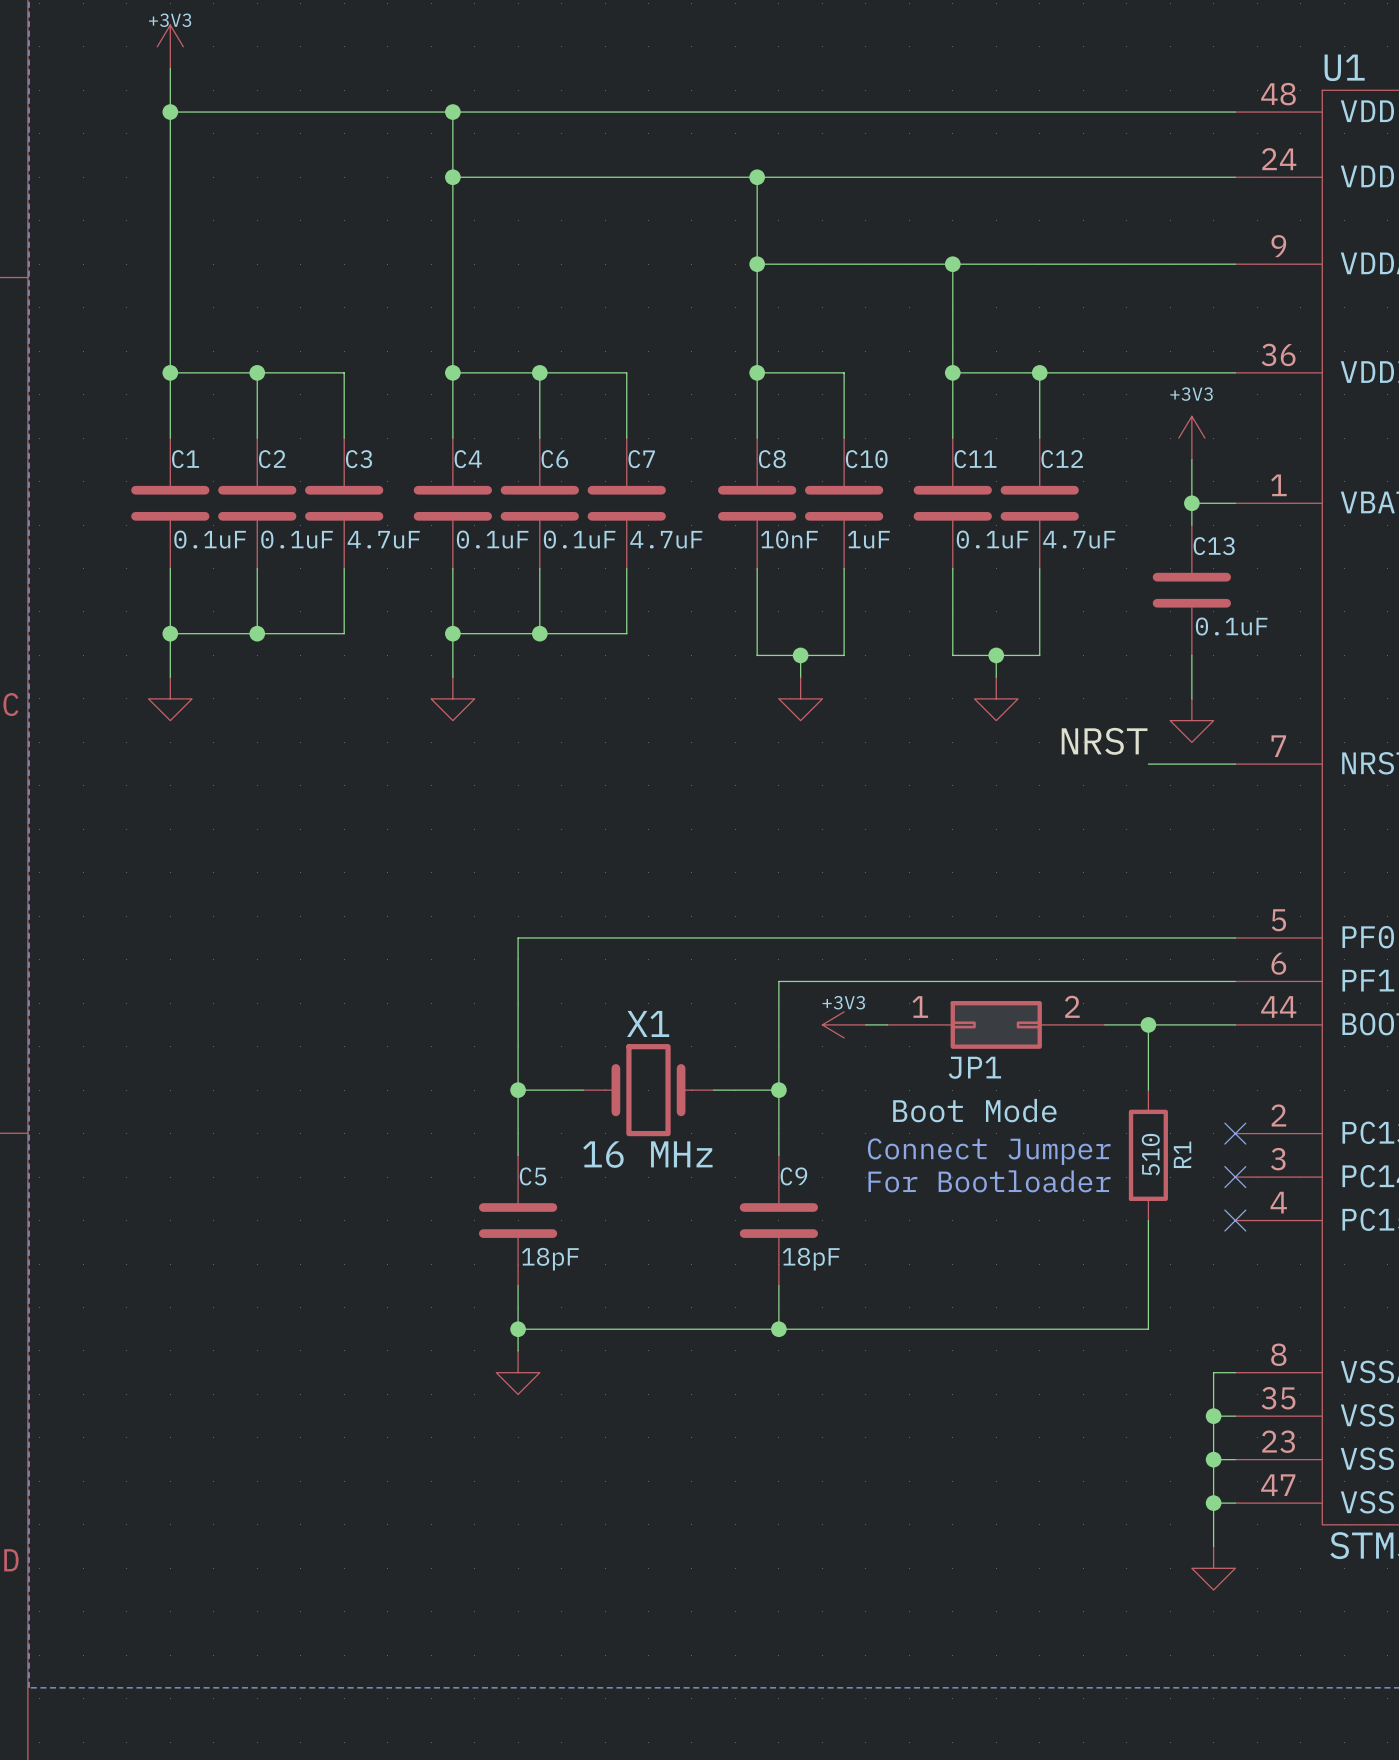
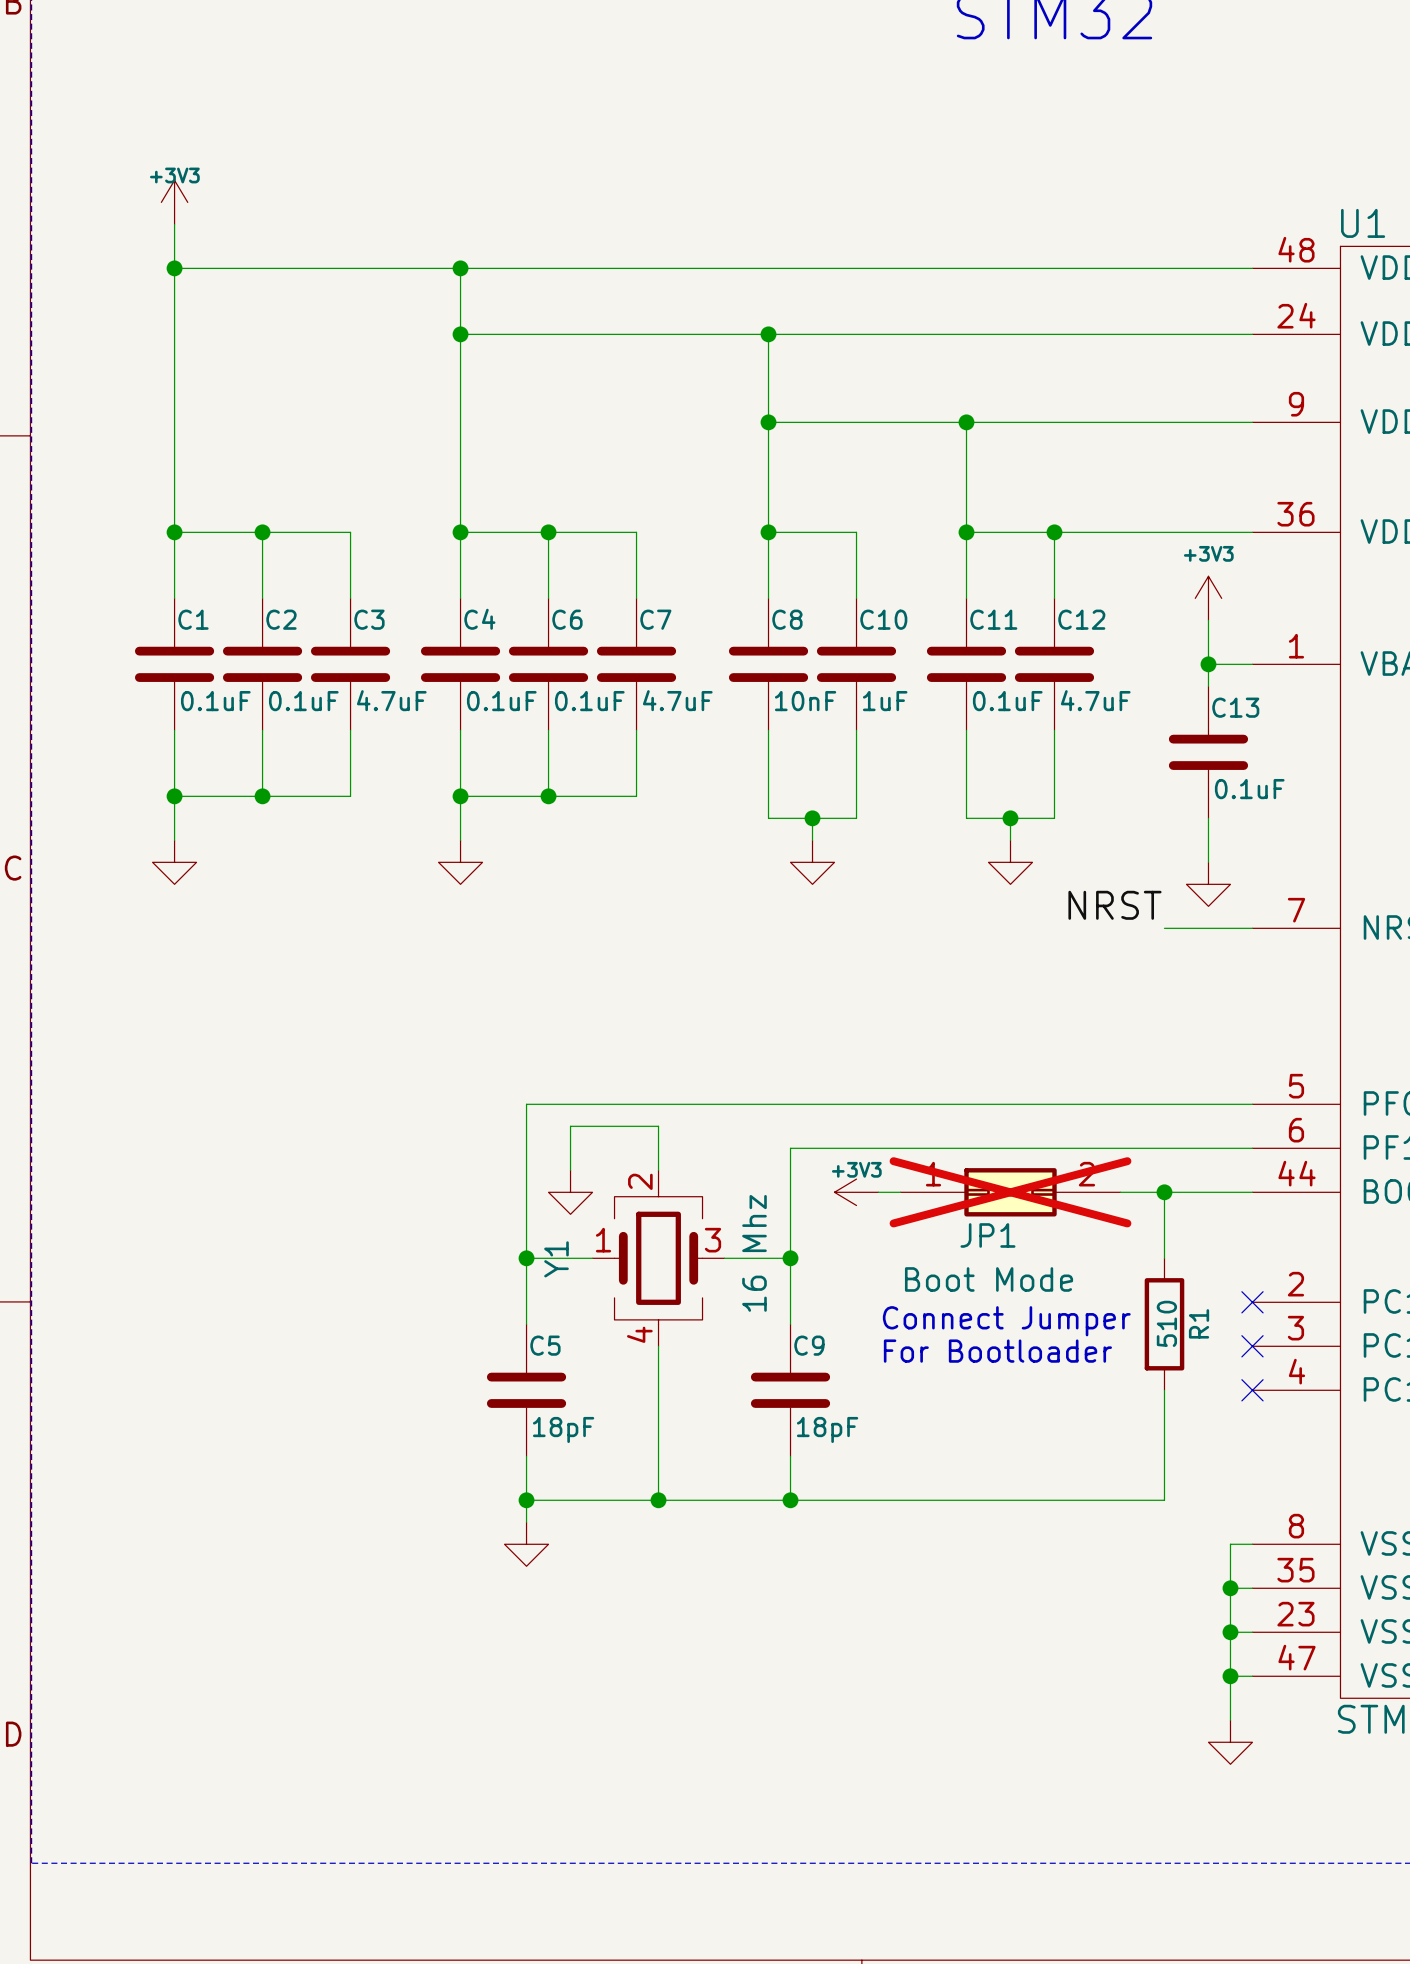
wire: none -> (570, 1170) (570, 1126) (658, 1126) (658, 1170)
power symbol: none -> (570, 1192)
JP1 do-not-place cross: none -> (1010, 1192)
X1: 16 MHz (648, 1090) -> none
Y1: none -> 16 Mhz (658, 1258)
wire: none -> (658, 1346) (658, 1500)
junction: none -> (658, 1500)

